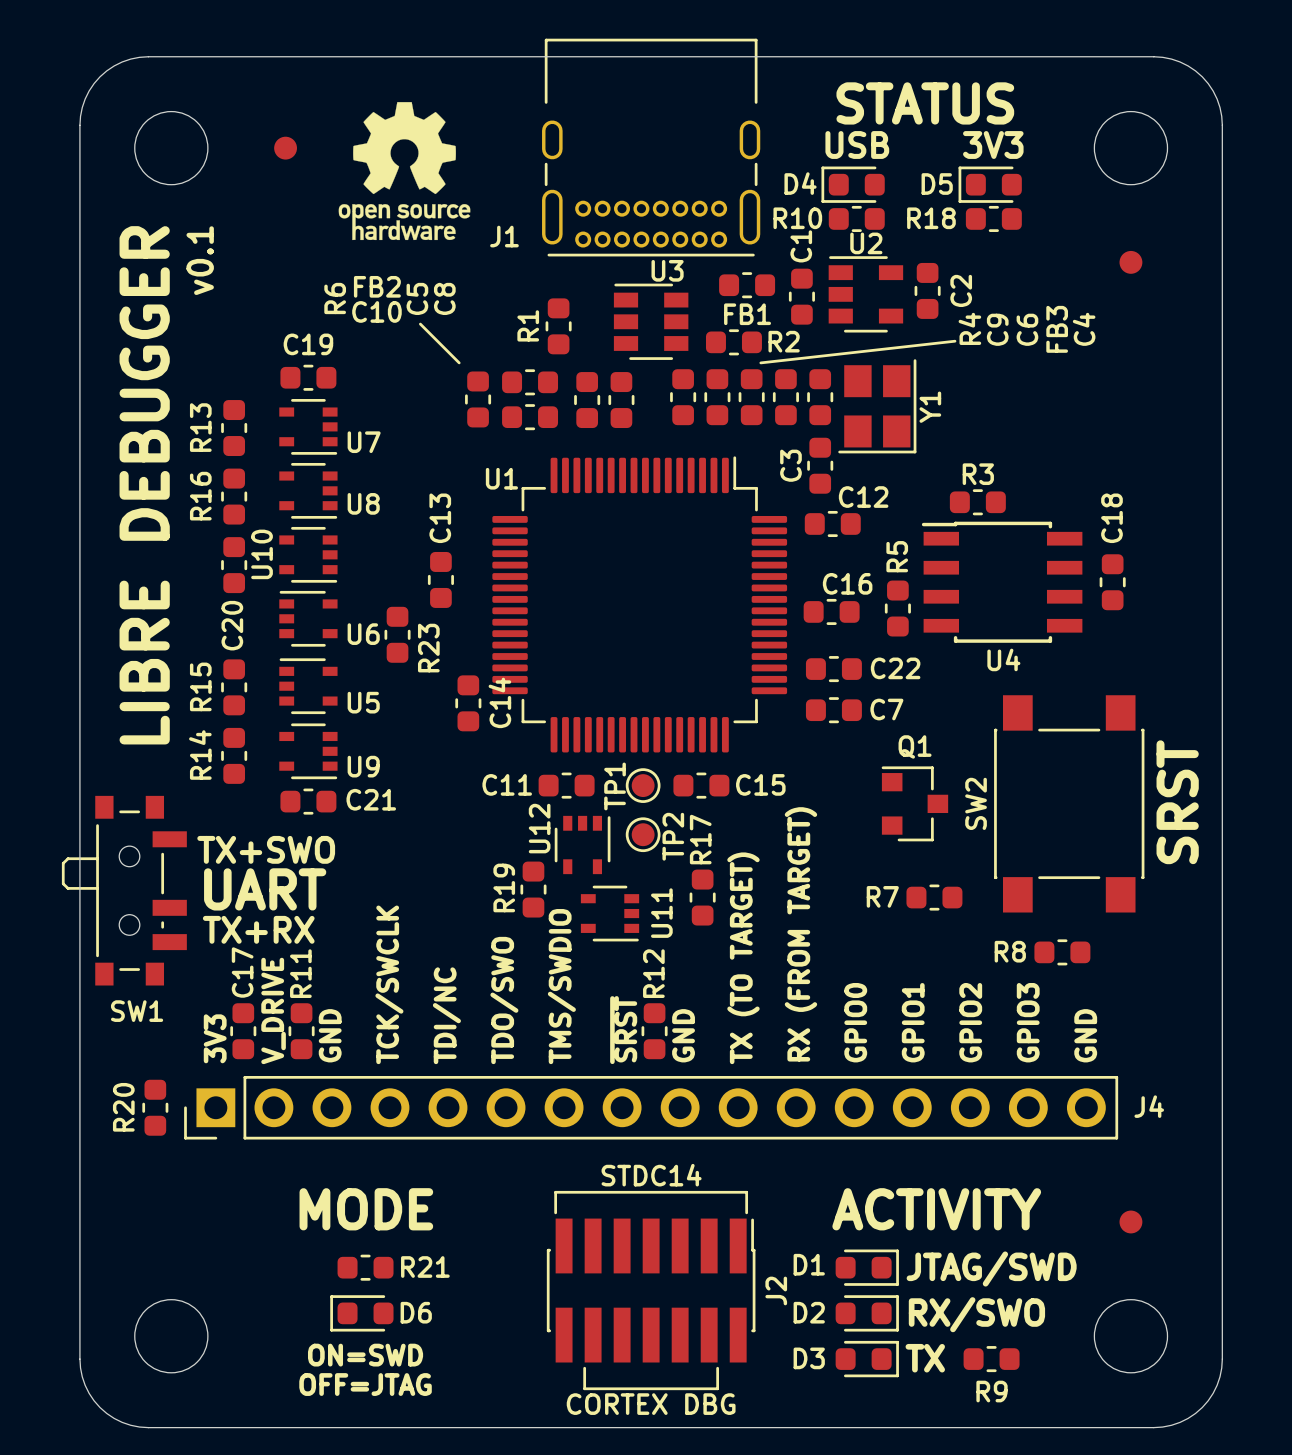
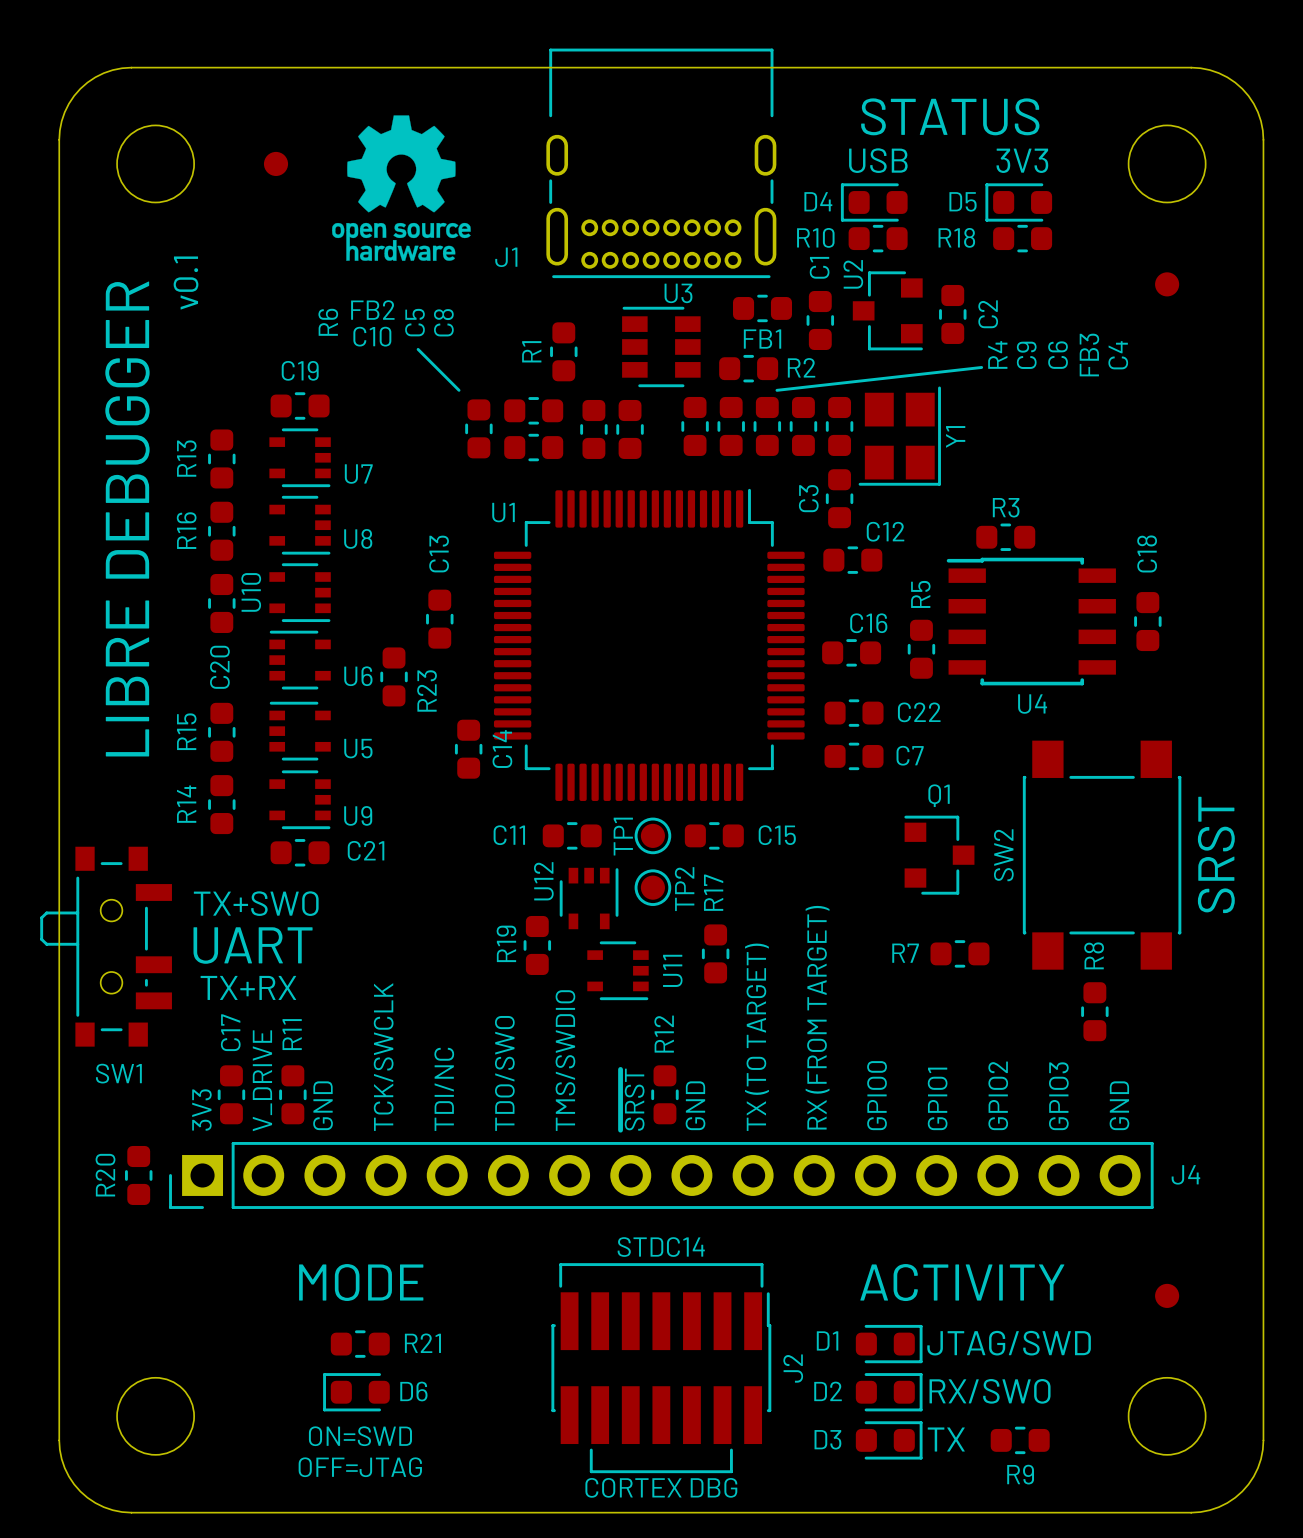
U2 footprint: [828, 256, 904, 333] -> [852, 271, 923, 351]
R8 rotation: 0° (1062, 952) -> 90° clockwise (1094, 1011)

